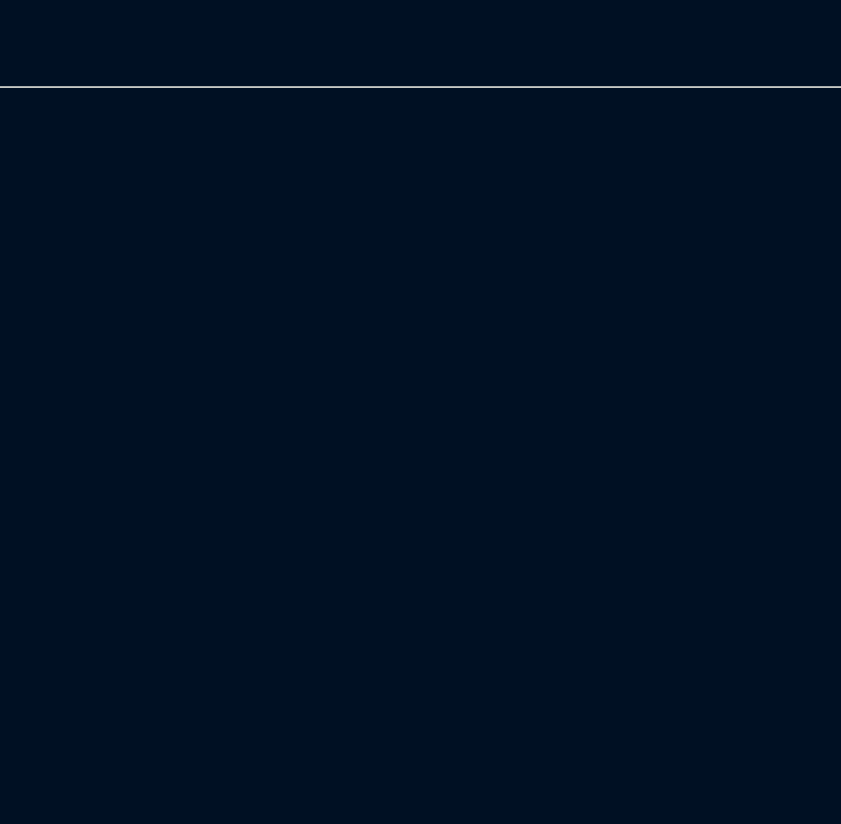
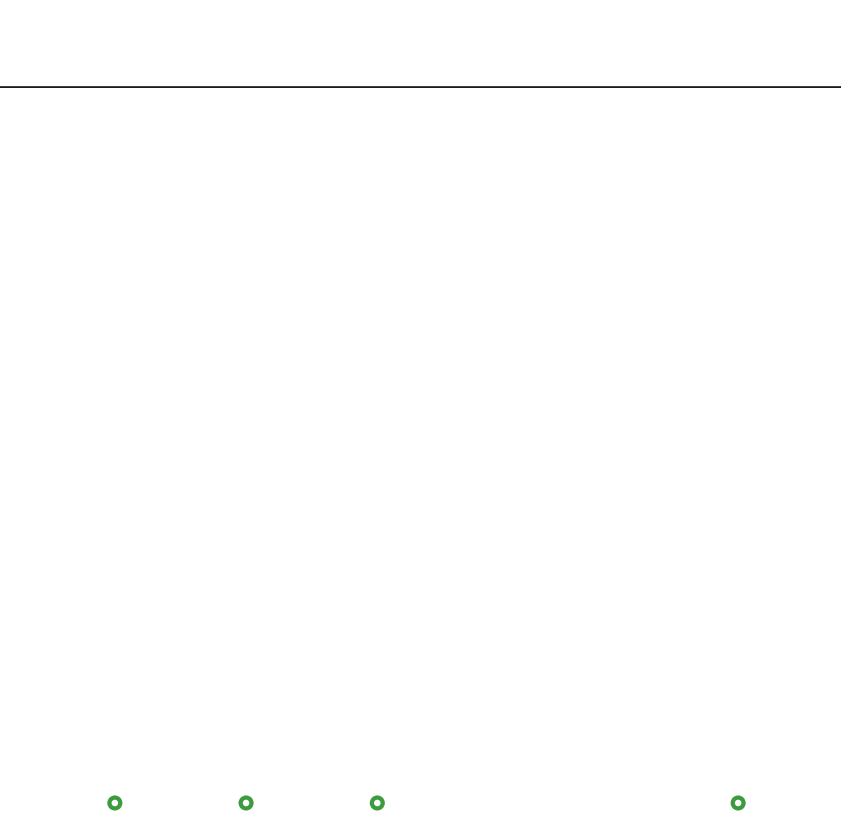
via: none -> (114, 802)
via: none -> (246, 802)
via: none -> (377, 802)
via: none -> (738, 802)

